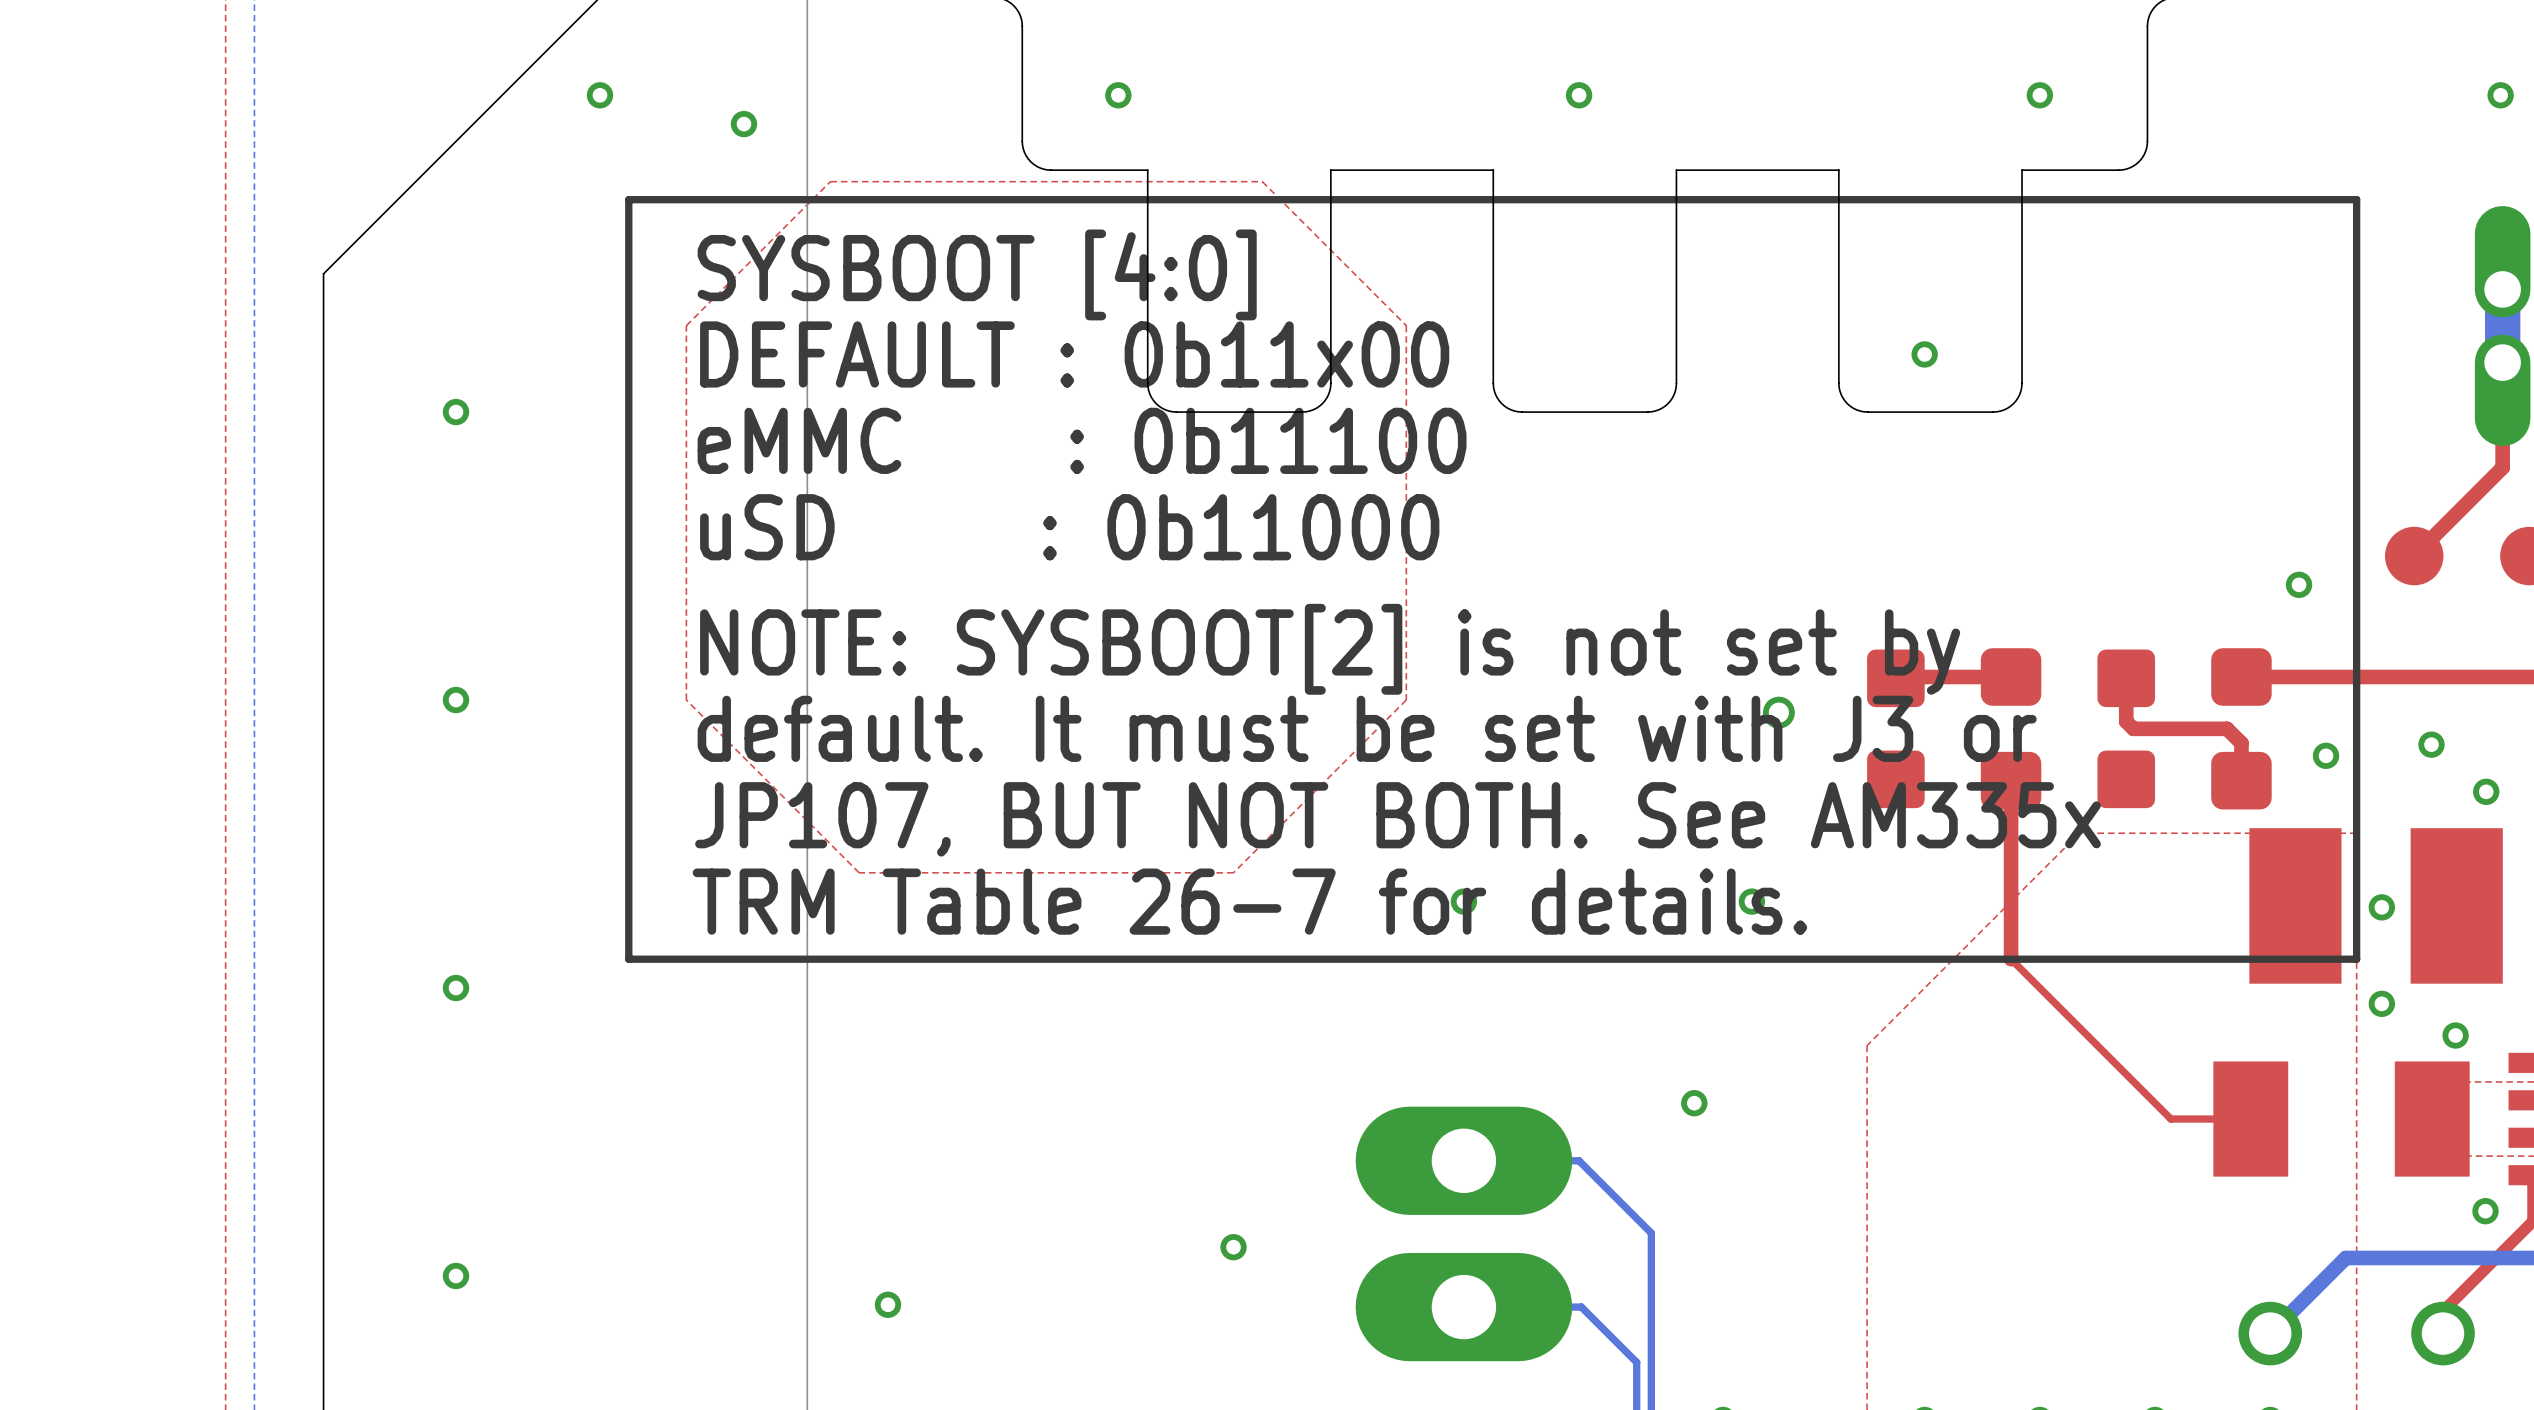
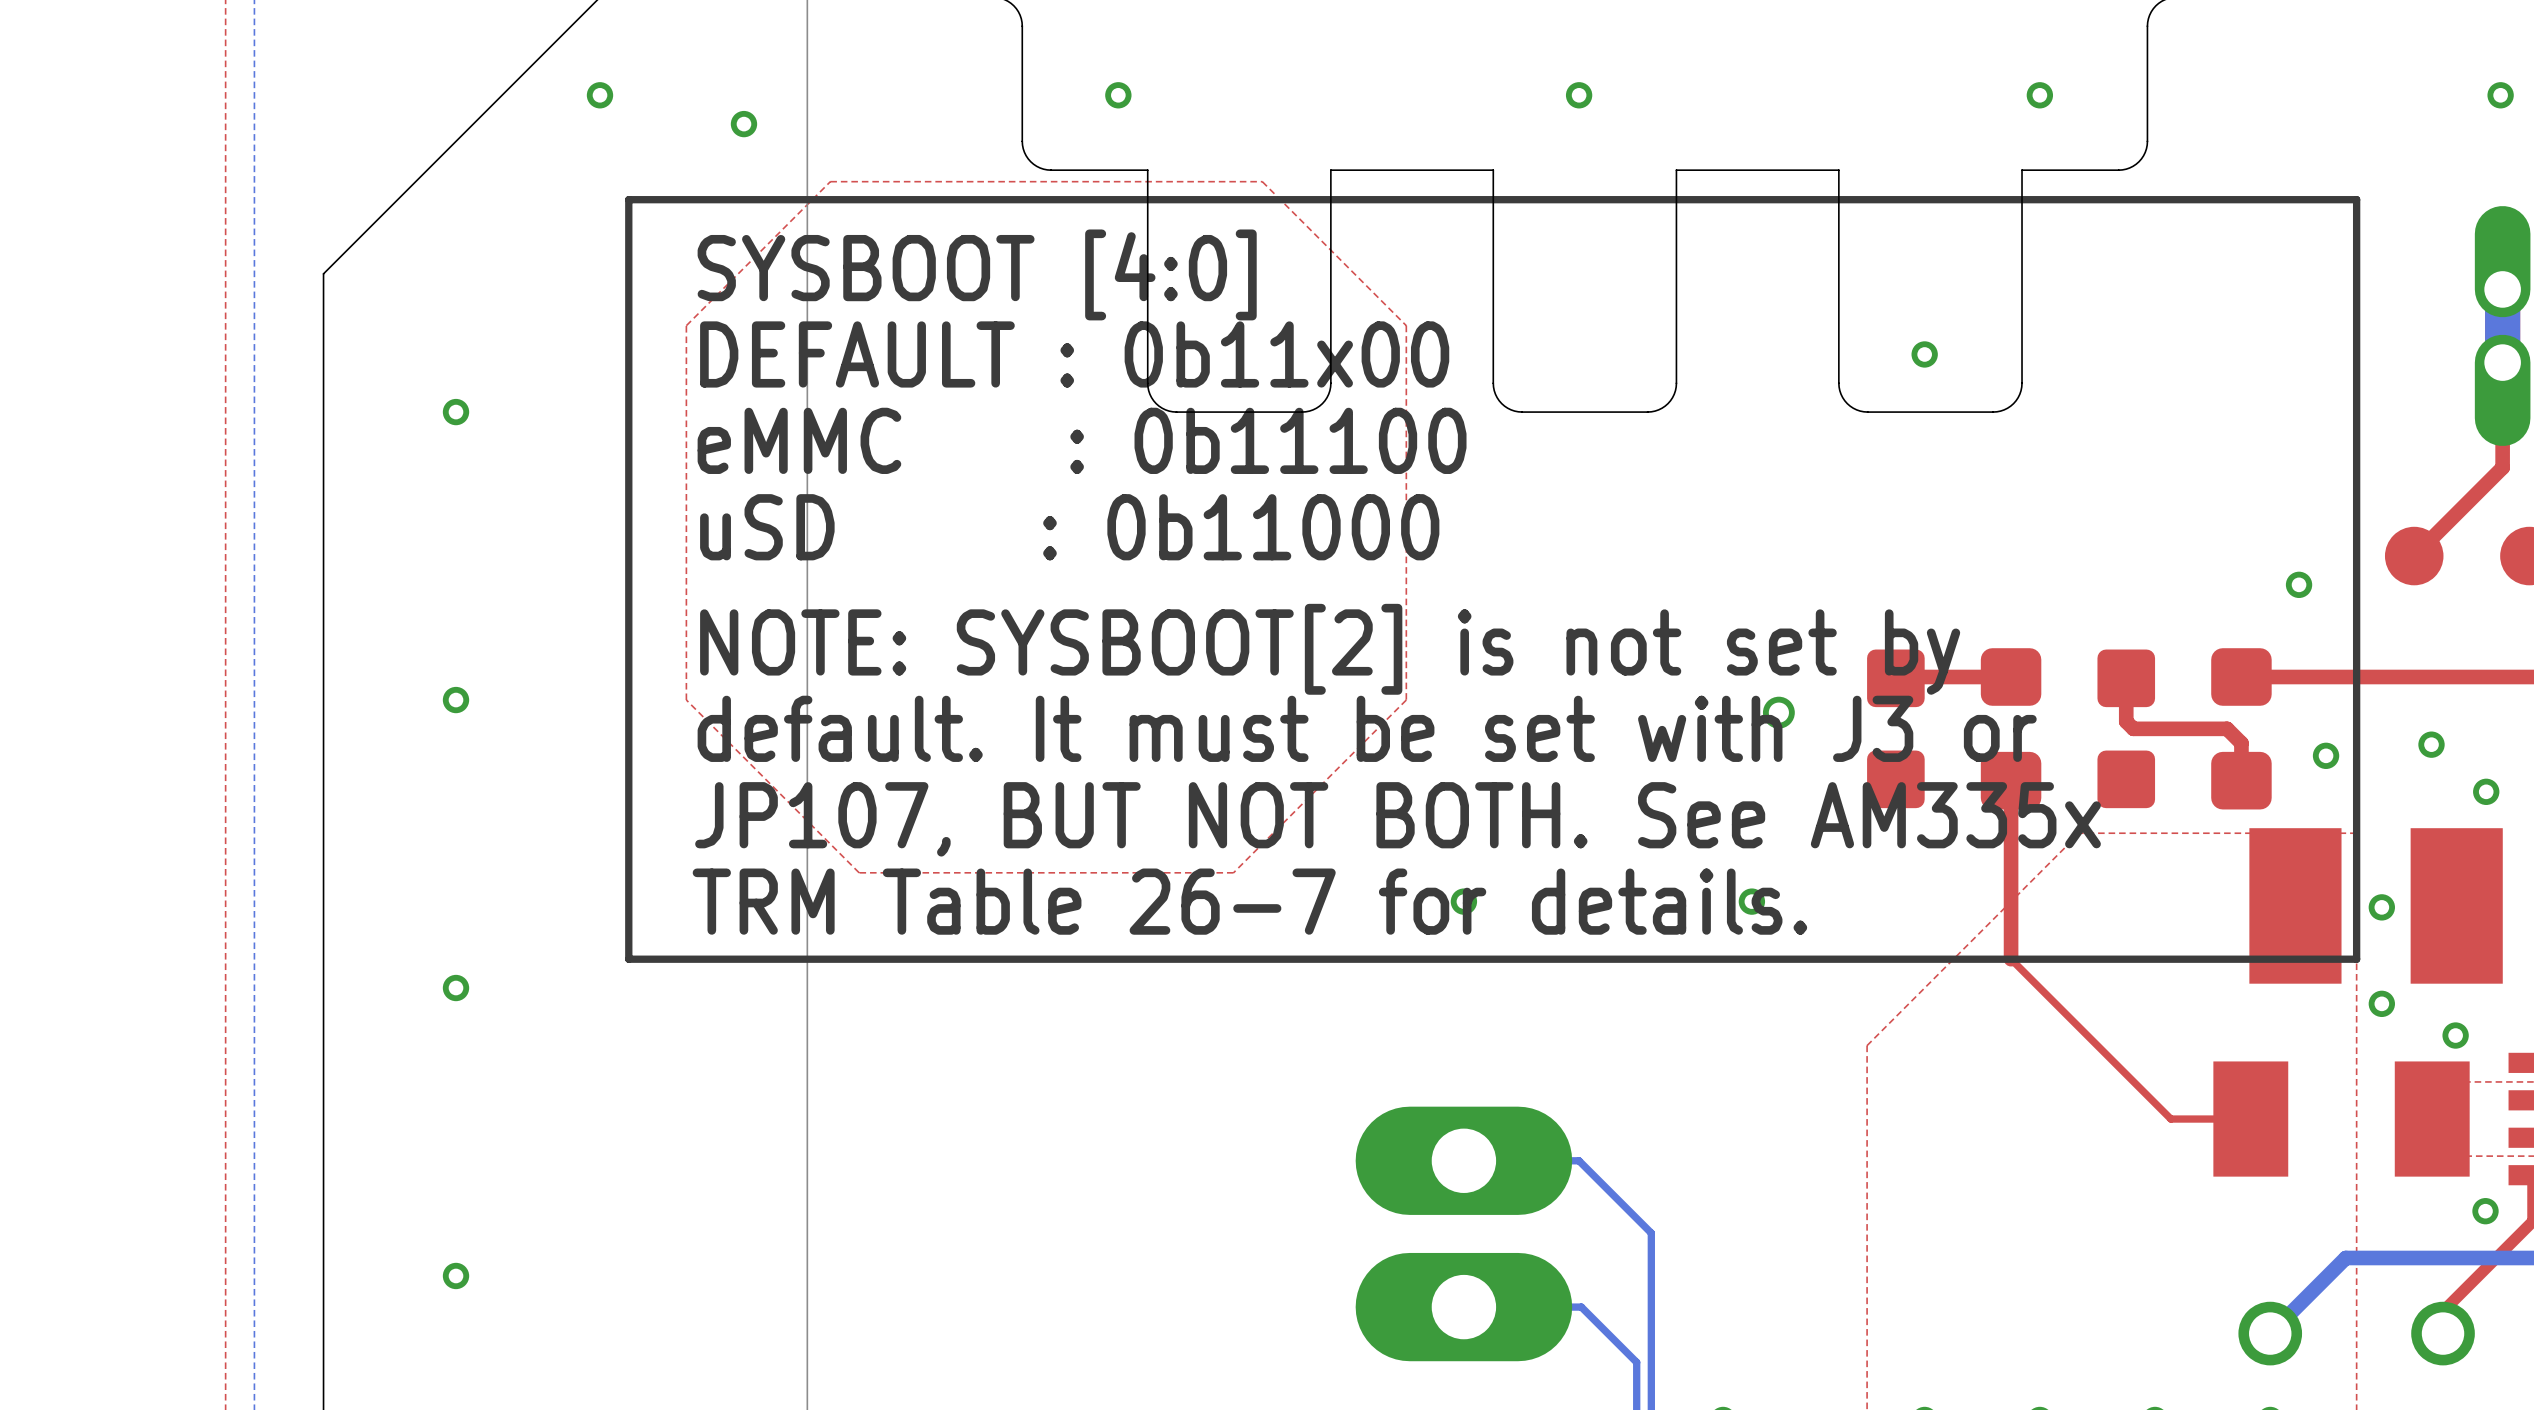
via: (1694, 1103) -> none
via: (1233, 1247) -> none
via: (887, 1304) -> none

